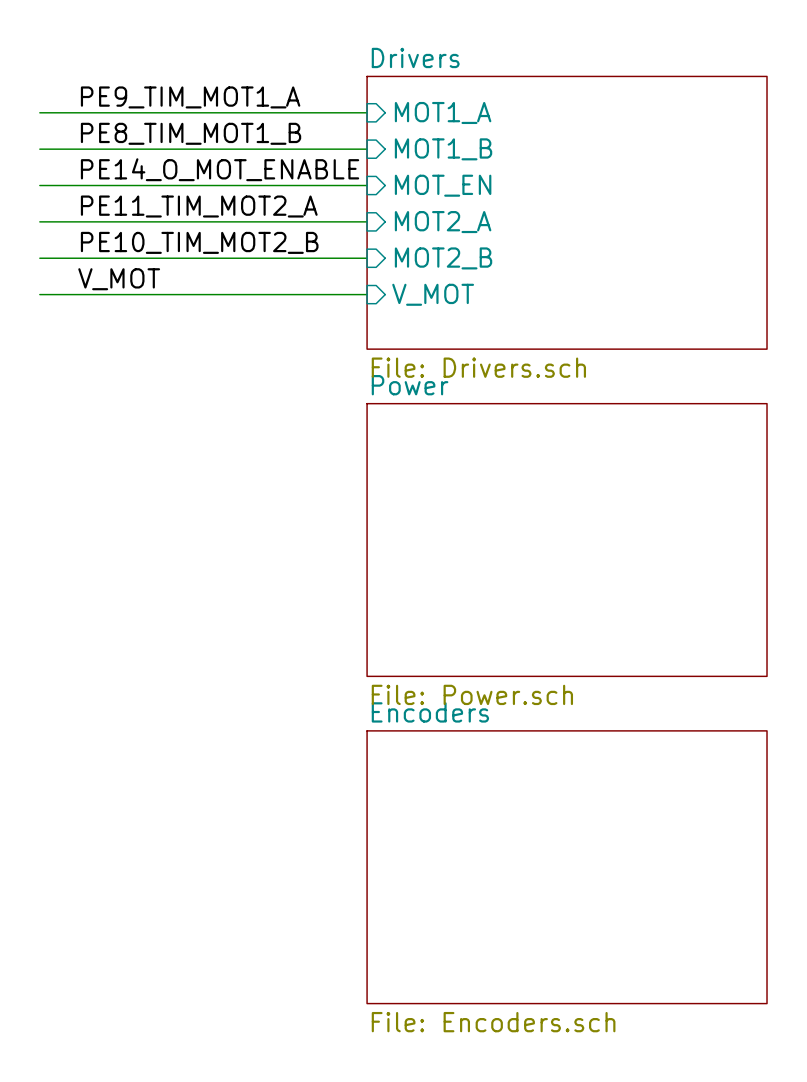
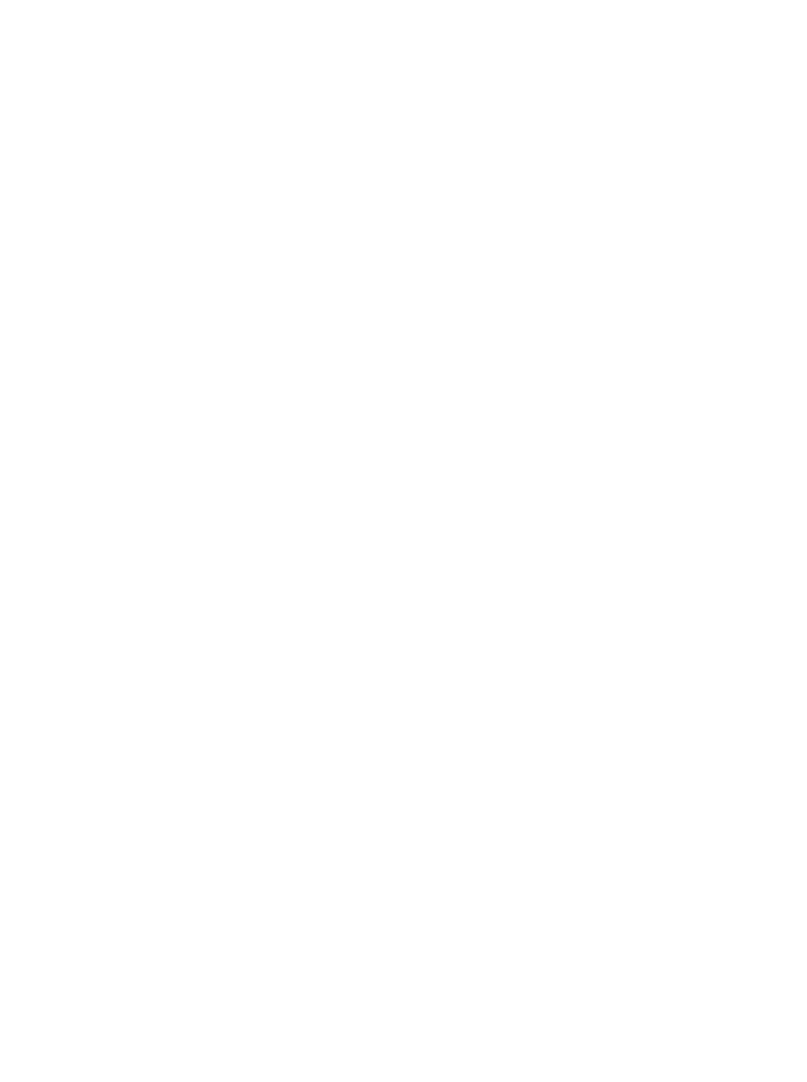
label: PE9_TIM_MOT1_A (190, 97) -> none
wire: (39, 112) (367, 112) -> none
sheet pin: MOT1_A (443, 112) -> none
label: PE8_TIM_MOT1_B (191, 133) -> none
wire: (39, 149) (367, 149) -> none
sheet pin: MOT1_B (443, 149) -> none
label: PE14_O_MOT_ENABLE (220, 169) -> none
wire: (39, 185) (367, 185) -> none
sheet pin: MOT_EN (443, 185) -> none
label: PE11_TIM_MOT2_A (199, 206) -> none
sheet Drivers: File: Drivers.sch (567, 212) -> none
wire: (39, 221) (367, 221) -> none
sheet pin: MOT2_A (443, 222) -> none
label: PE10_TIM_MOT2_B (199, 242) -> none
wire: (39, 258) (367, 258) -> none
sheet pin: MOT2_B (443, 258) -> none
label: V_MOT (119, 279) -> none
wire: (39, 294) (367, 294) -> none
sheet pin: V_MOT (433, 294) -> none
sheet Power: File: Power.sch (567, 540) -> none
sheet Encoders: File: Encoders.sch (567, 867) -> none

